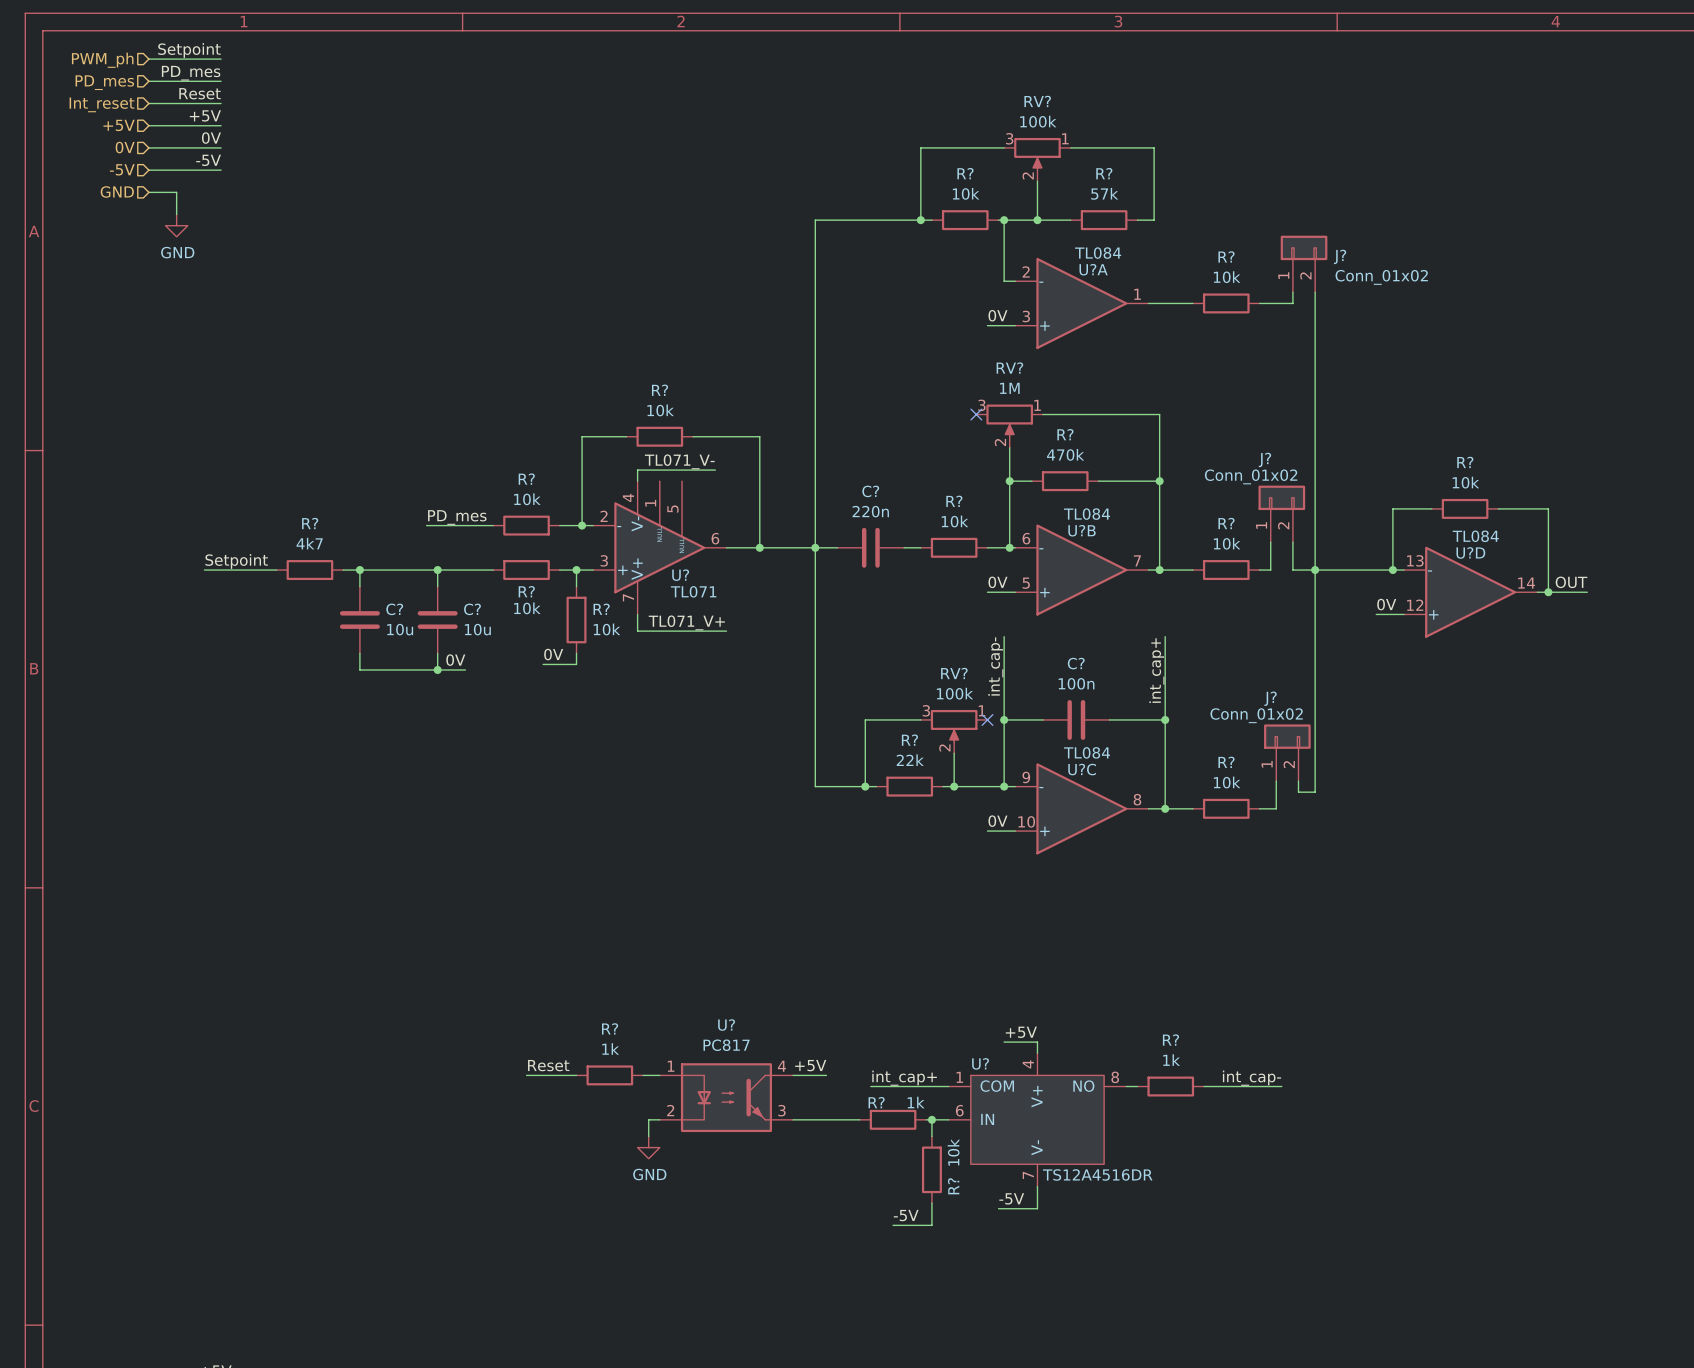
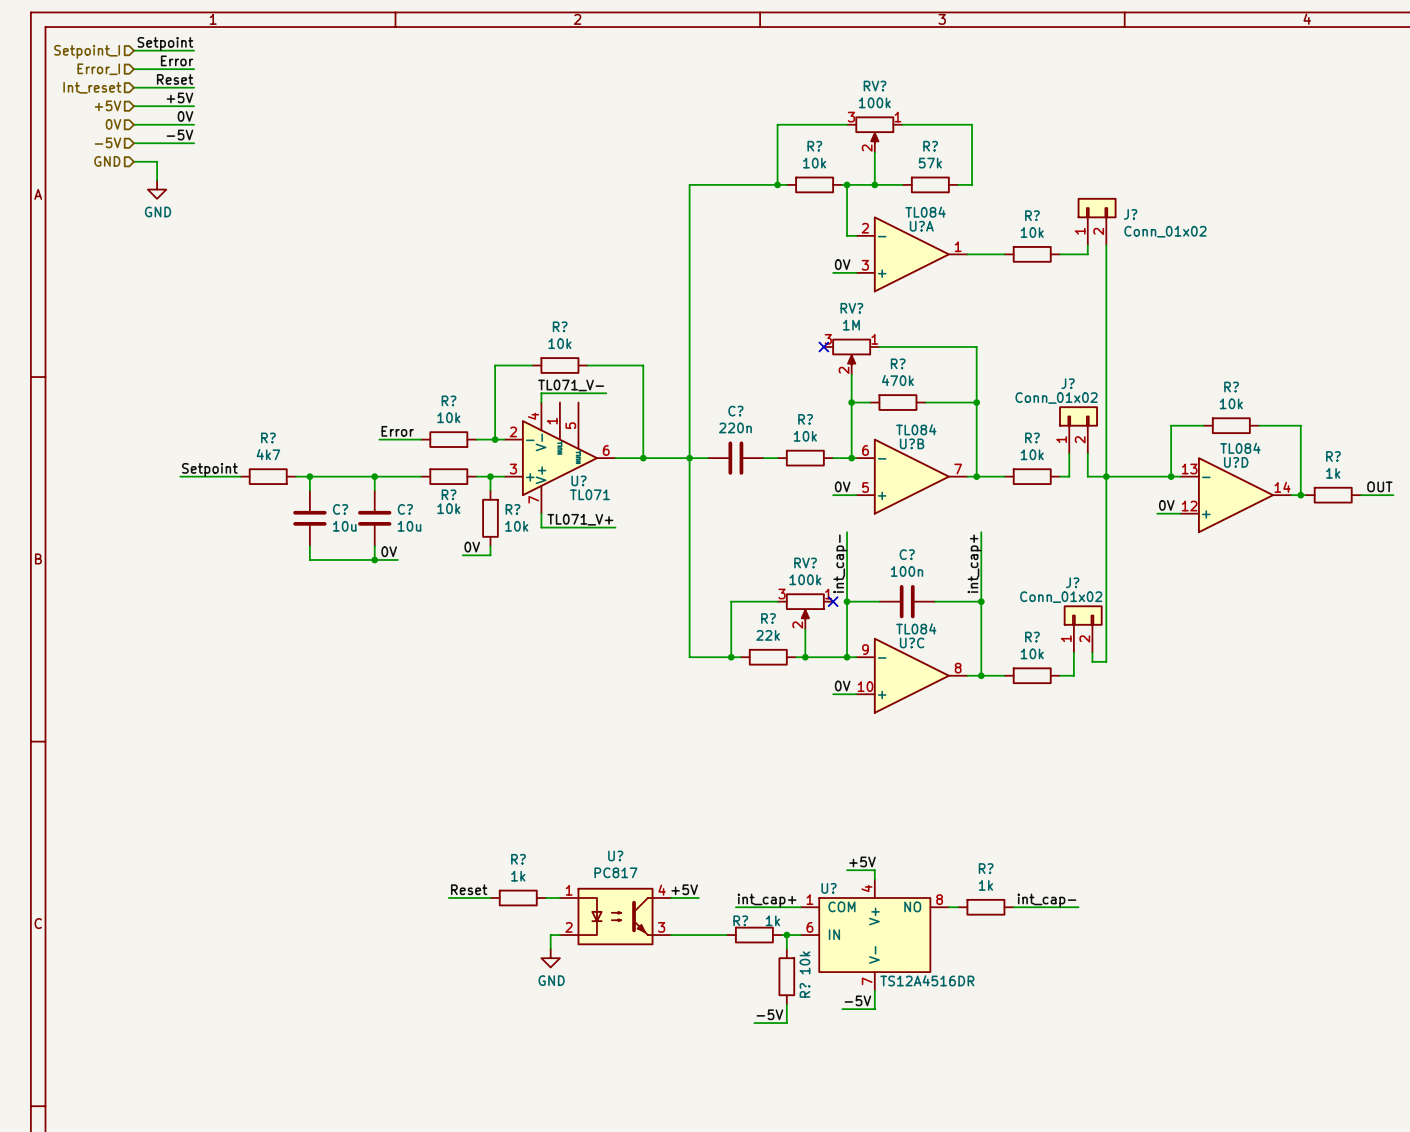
hierarchical label: PWM_ph (102, 60) -> Setpoint_I (87, 51)
label: PD_mes (191, 73) -> Error (177, 60)
hierarchical label: PD_mes (104, 82) -> Error_I (98, 69)
label: none -> Error (397, 431)
label: PD_mes (457, 517) -> none
wire: (426, 525) (443, 525) -> none
label position: OUT (1571, 582) -> OUT (1379, 486)
wire: (1553, 592) (1587, 592) -> none
R?: none -> 1k (1333, 495)
wire: none -> (1360, 495) (1393, 495)

